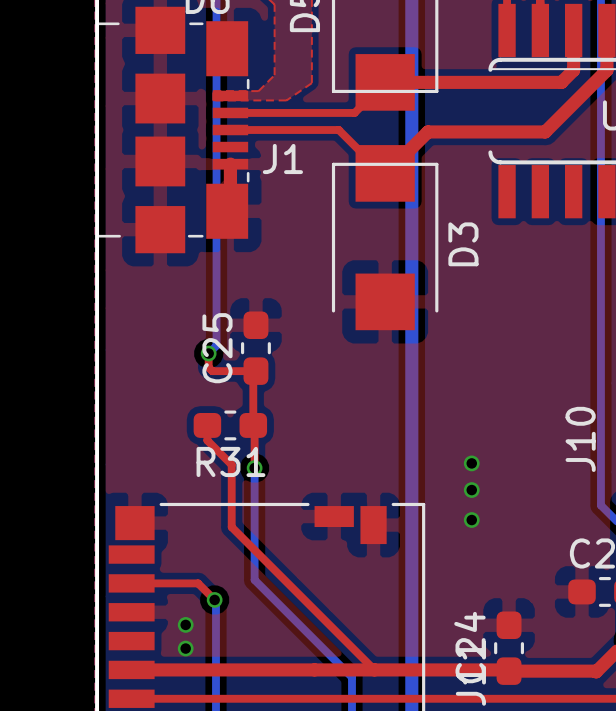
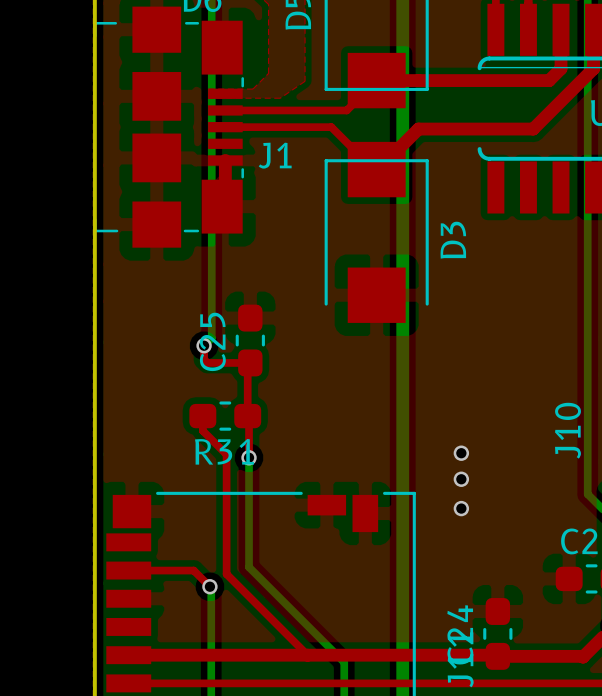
top track: (231, 527) (374, 669) -> (226, 515) (226, 574) (307, 655)
via: (185, 624) -> none
via: (185, 648) -> none

